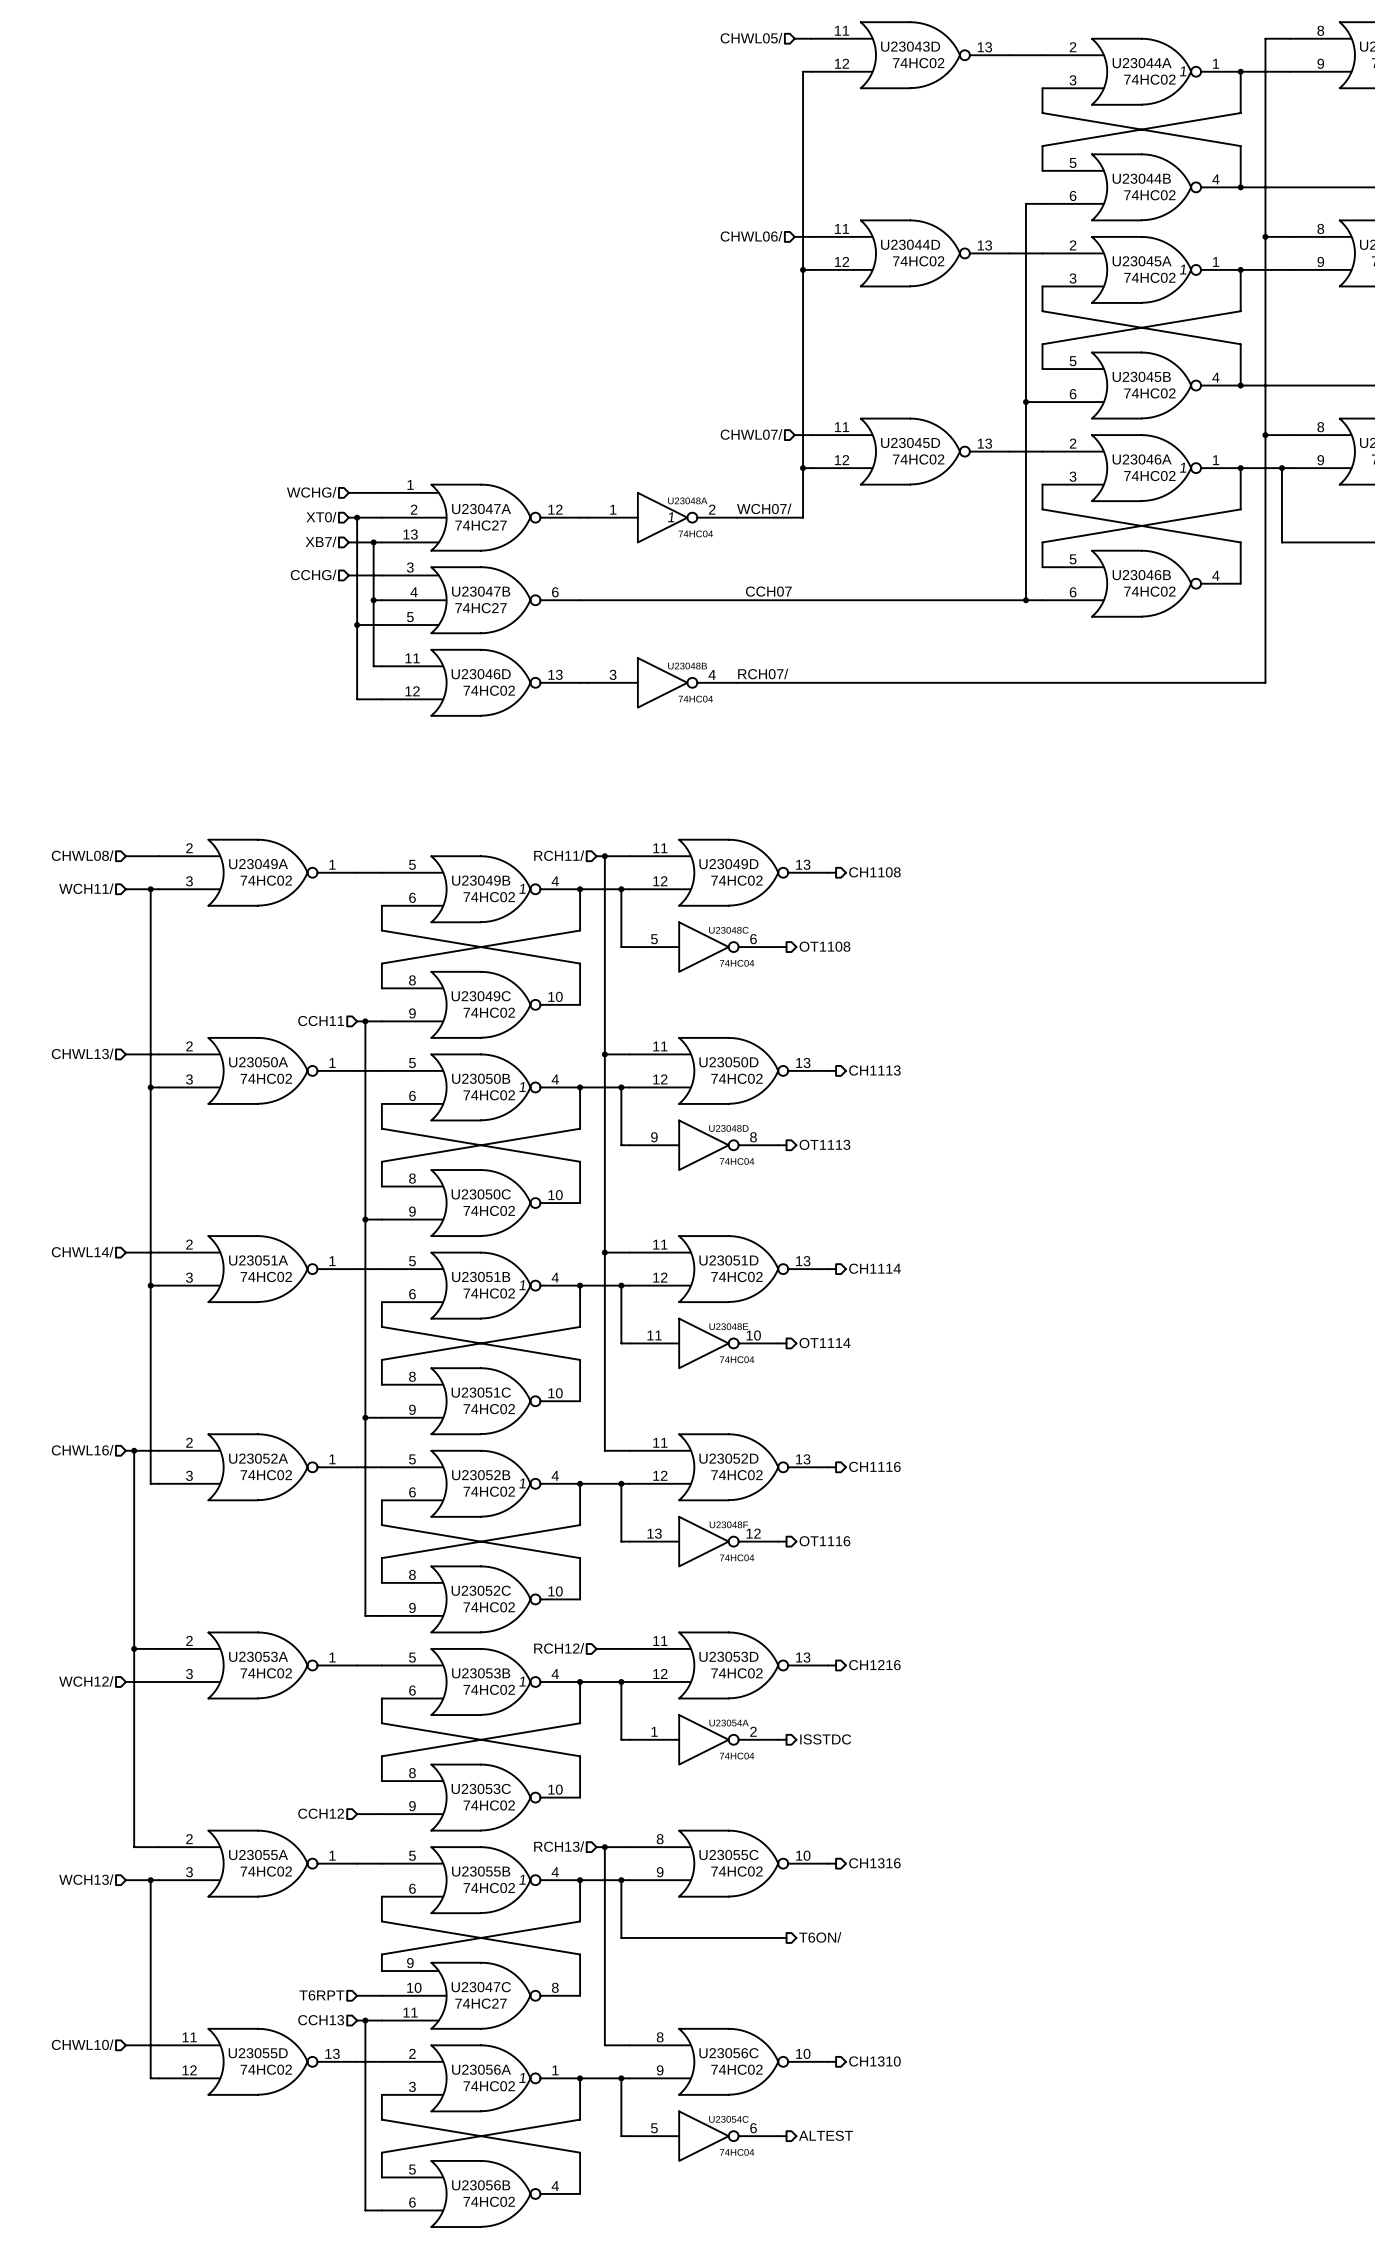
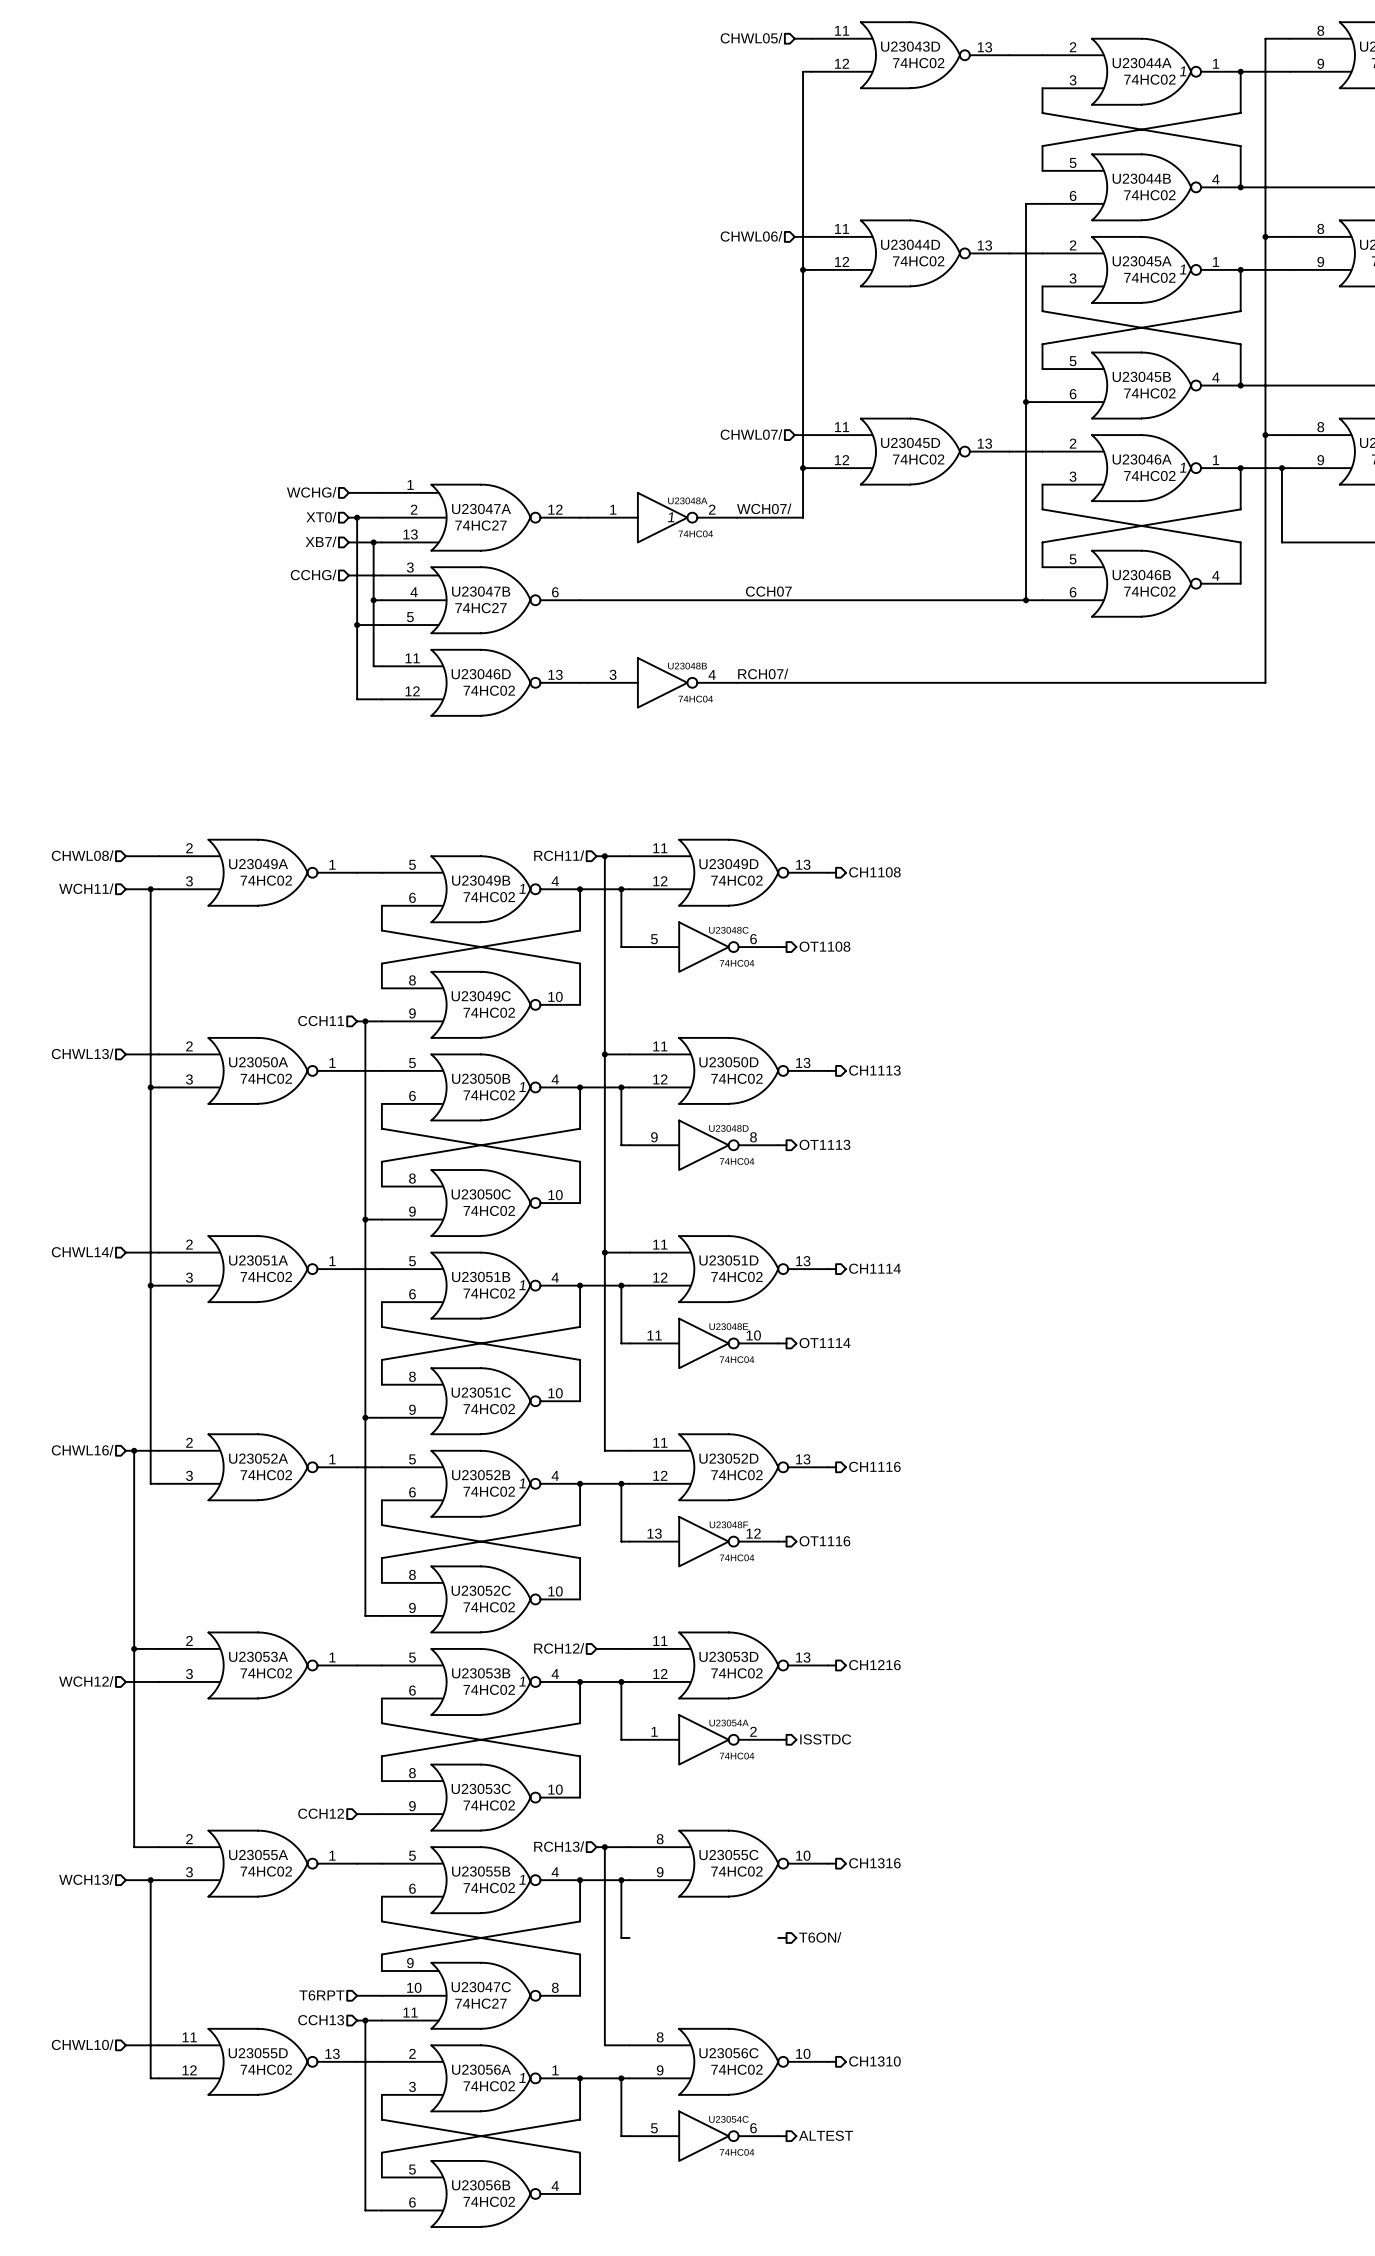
wire: (629, 1937) (778, 1937) -> none

